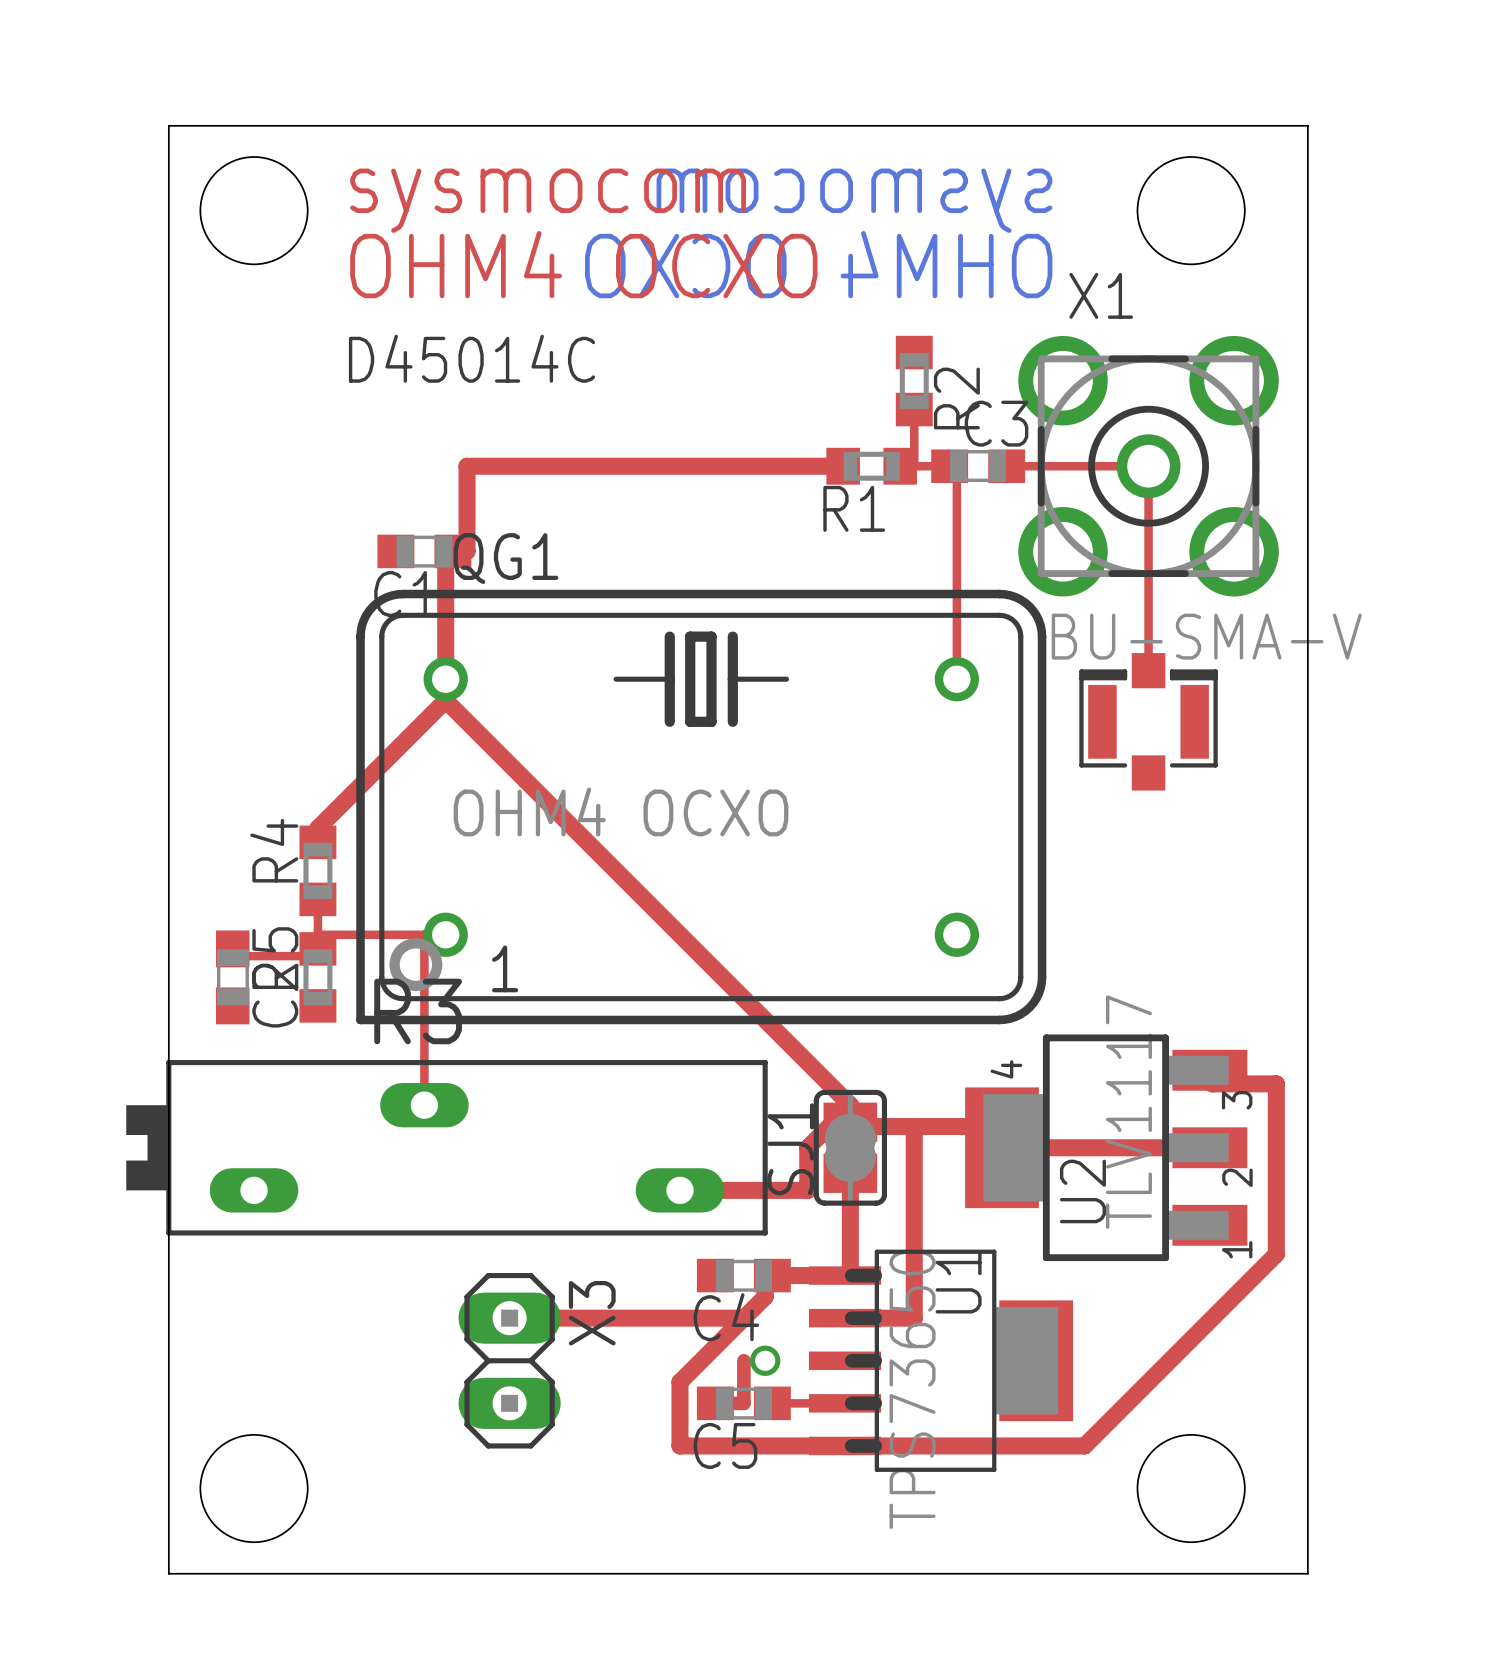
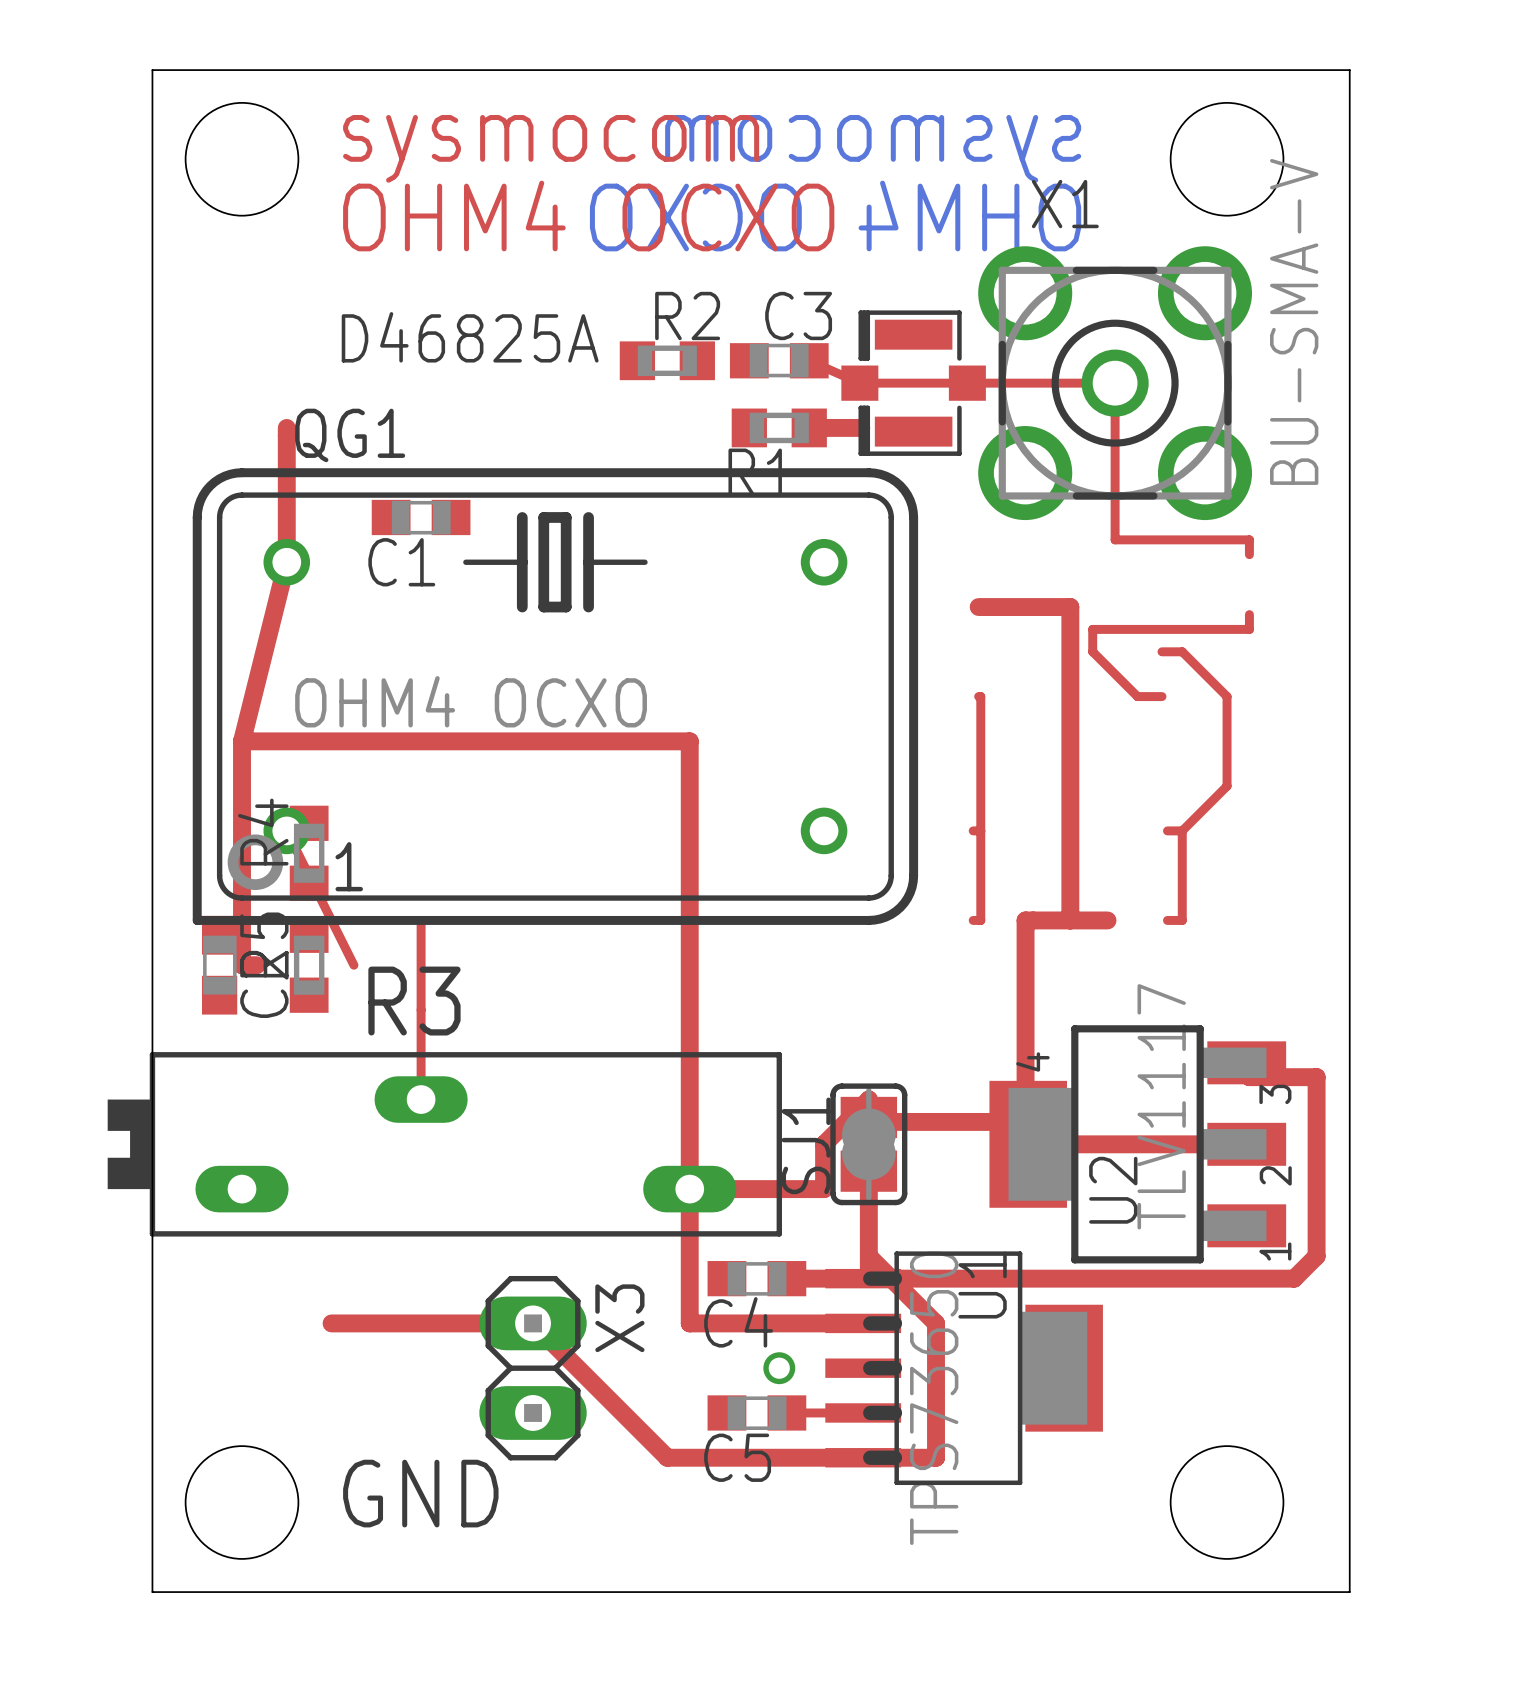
text: D45014C (471, 358) -> D46825A (470, 337)
R2 rotation: 0° (914, 381) -> 90° clockwise (667, 360)
R2 position: (914, 381) -> (667, 360)
R2 name position: R2 (956, 398) -> R2 (687, 315)
top track: none -> (809, 360) (859, 383) (1115, 383) (1115, 539) (1249, 539) (1249, 554)
top track: (914, 409) (914, 466) -> none
top track: none -> (286, 427) (286, 562) (242, 741)
top track: (793, 466) (467, 466) (467, 551) (445, 551) (445, 700) -> none
R1 position: (871, 466) -> (779, 427)
top track: (900, 466) (956, 466) (956, 679) -> none
C3 position: (978, 466) -> (779, 360)
top track: (1006, 466) (1148, 466) (1148, 670) -> none
X1 position: (1148, 466) -> (1115, 383)
top track: none -> (978, 607) (1070, 607) (1070, 920)
X1 value rotation: 0° (1206, 636) -> 90° counterclockwise (1294, 321)
top track: none -> (1249, 614) (1249, 629) (1092, 629) (1092, 651) (1137, 696) (1161, 696)
top track: none -> (1161, 651) (1182, 651) (1227, 696) (1227, 786) (1182, 830)
top track: (445, 700) (317, 828) (317, 842) -> none
top track: (445, 700) (850, 1105) -> none
top track: none -> (978, 696) (980, 696) (980, 920) (973, 920)
part rotation: 0° (1148, 721) -> 90° counterclockwise (913, 383)
part position: (1148, 721) -> (913, 383)
top track: none -> (242, 741) (242, 965) (256, 965)
top track: none -> (242, 741) (689, 741) (689, 1323)
QG1 position: (701, 807) -> (555, 696)
top track: none -> (286, 830) (353, 965)
top track: none -> (973, 830) (980, 830)
top track: none -> (1167, 830) (1182, 830)
top track: none -> (1182, 830) (1182, 920) (1167, 920)
top track: (317, 899) (317, 956) (232, 956) (232, 948) -> none
top track: (317, 934) (445, 934) -> none
top track: none -> (1107, 920) (1025, 920) (1025, 1121) (1028, 1144)
top track: (914, 1126) (914, 1318) (845, 1318) -> (756, 1323) (863, 1323)
top track: none -> (868, 1256) (936, 1323) (936, 1457)
top track: (772, 1275) (765, 1275) (765, 1296) (679, 1382) (679, 1445) -> none
top track: (1255, 1275) (1084, 1445) (914, 1445) -> (1294, 1278) (868, 1278)
top track: none -> (331, 1323) (510, 1323)
top track: (530, 1318) (679, 1318) -> (533, 1323) (667, 1457) (689, 1457)
X3 position: (509, 1360) -> (533, 1368)
top track: (743, 1360) (743, 1403) (715, 1403) -> none
text: none -> GND (420, 1493)

